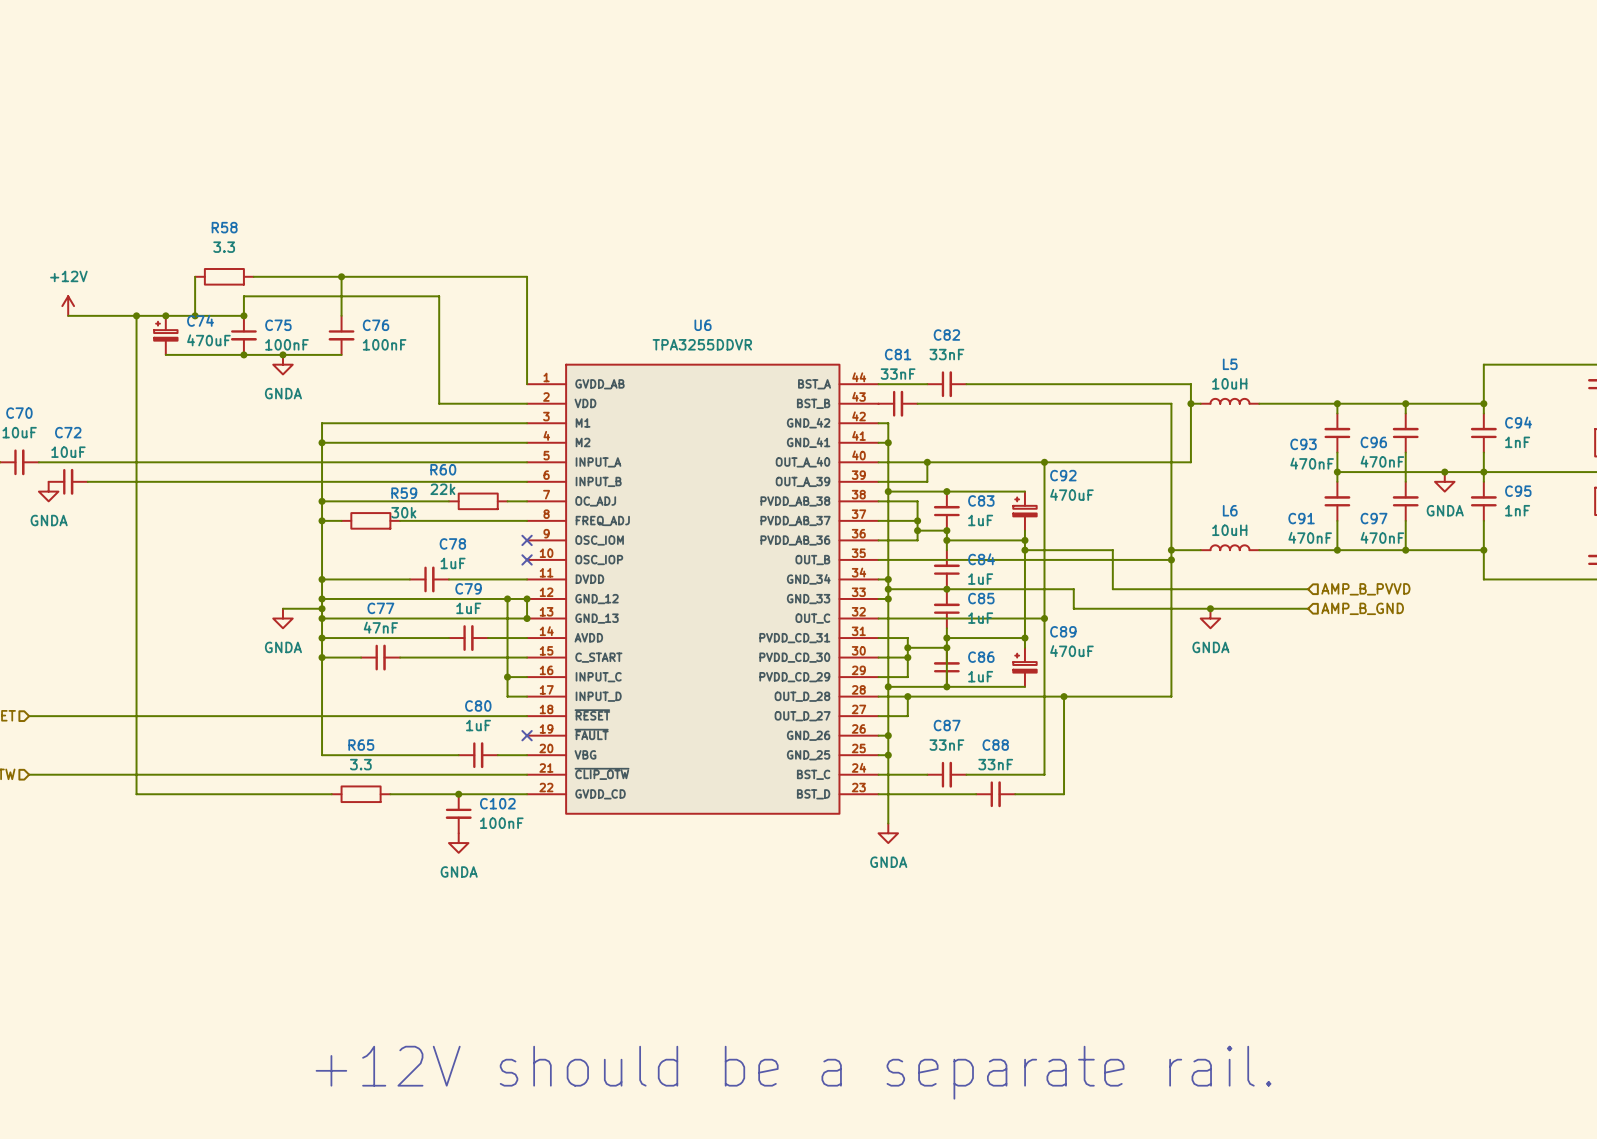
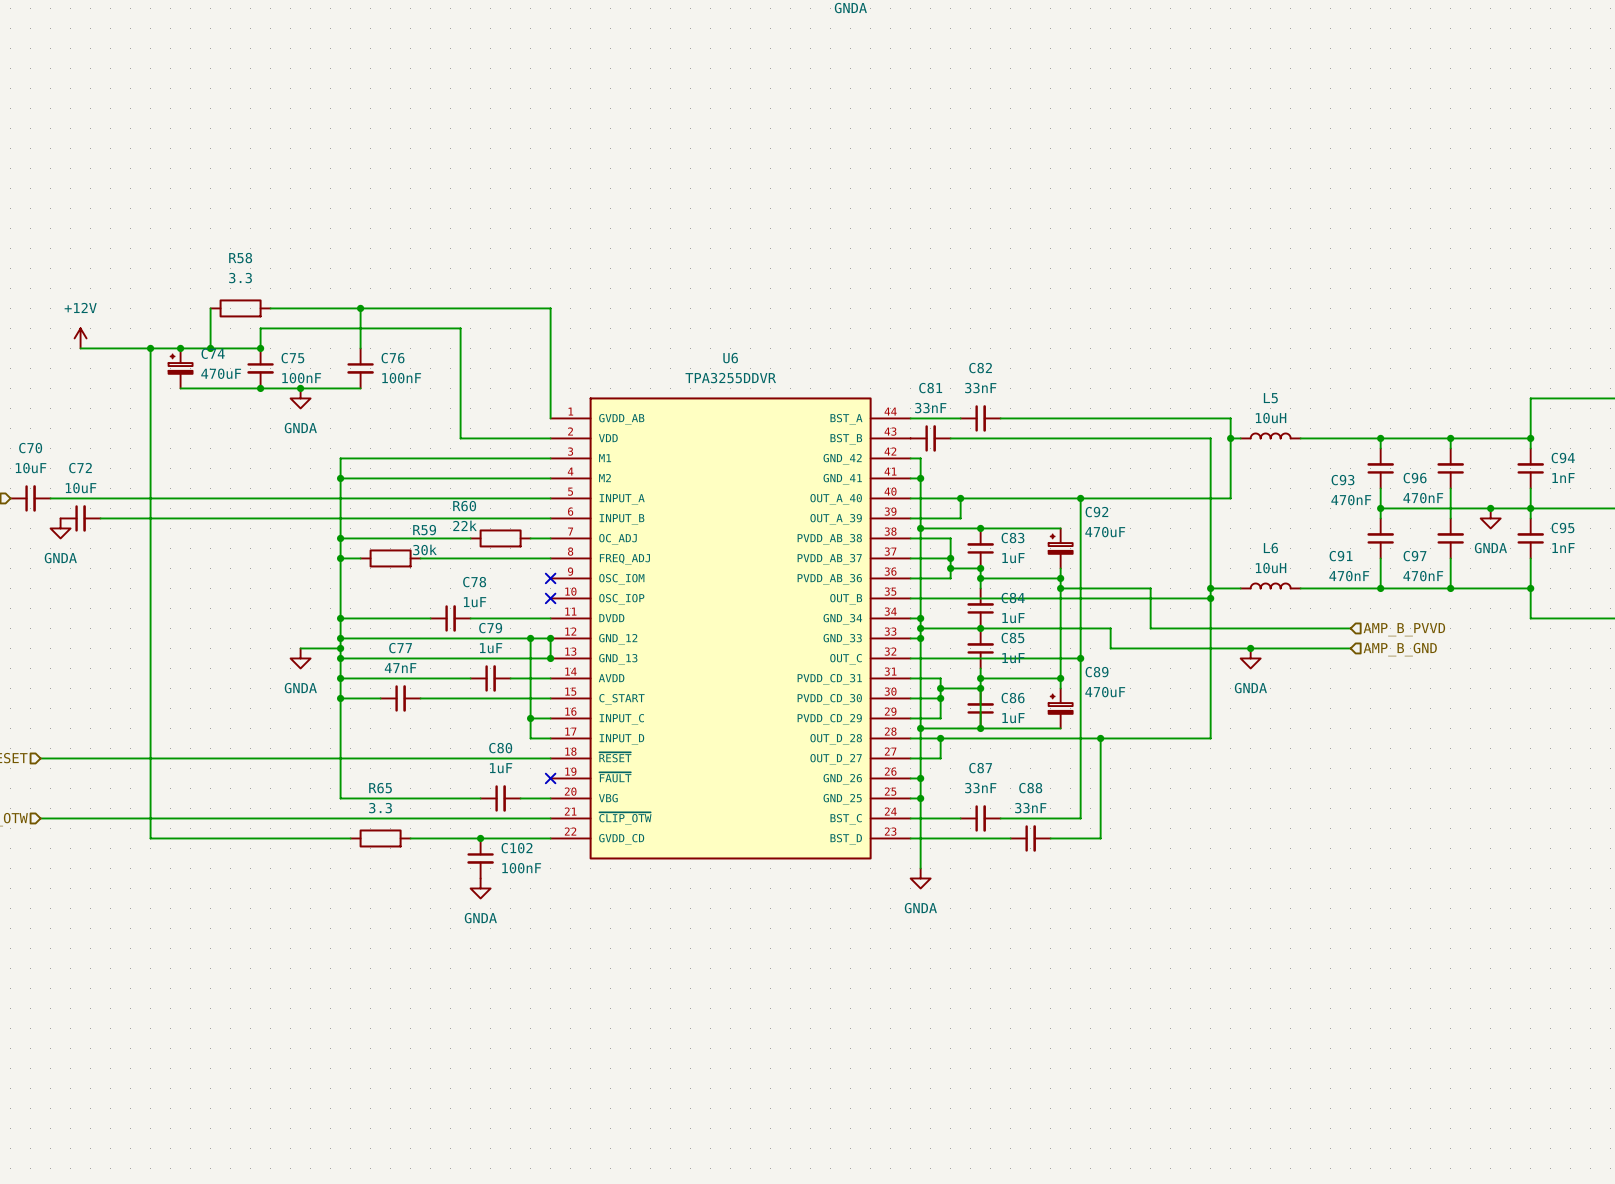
text: +12V should be a separate rail. (793, 1072) -> none

